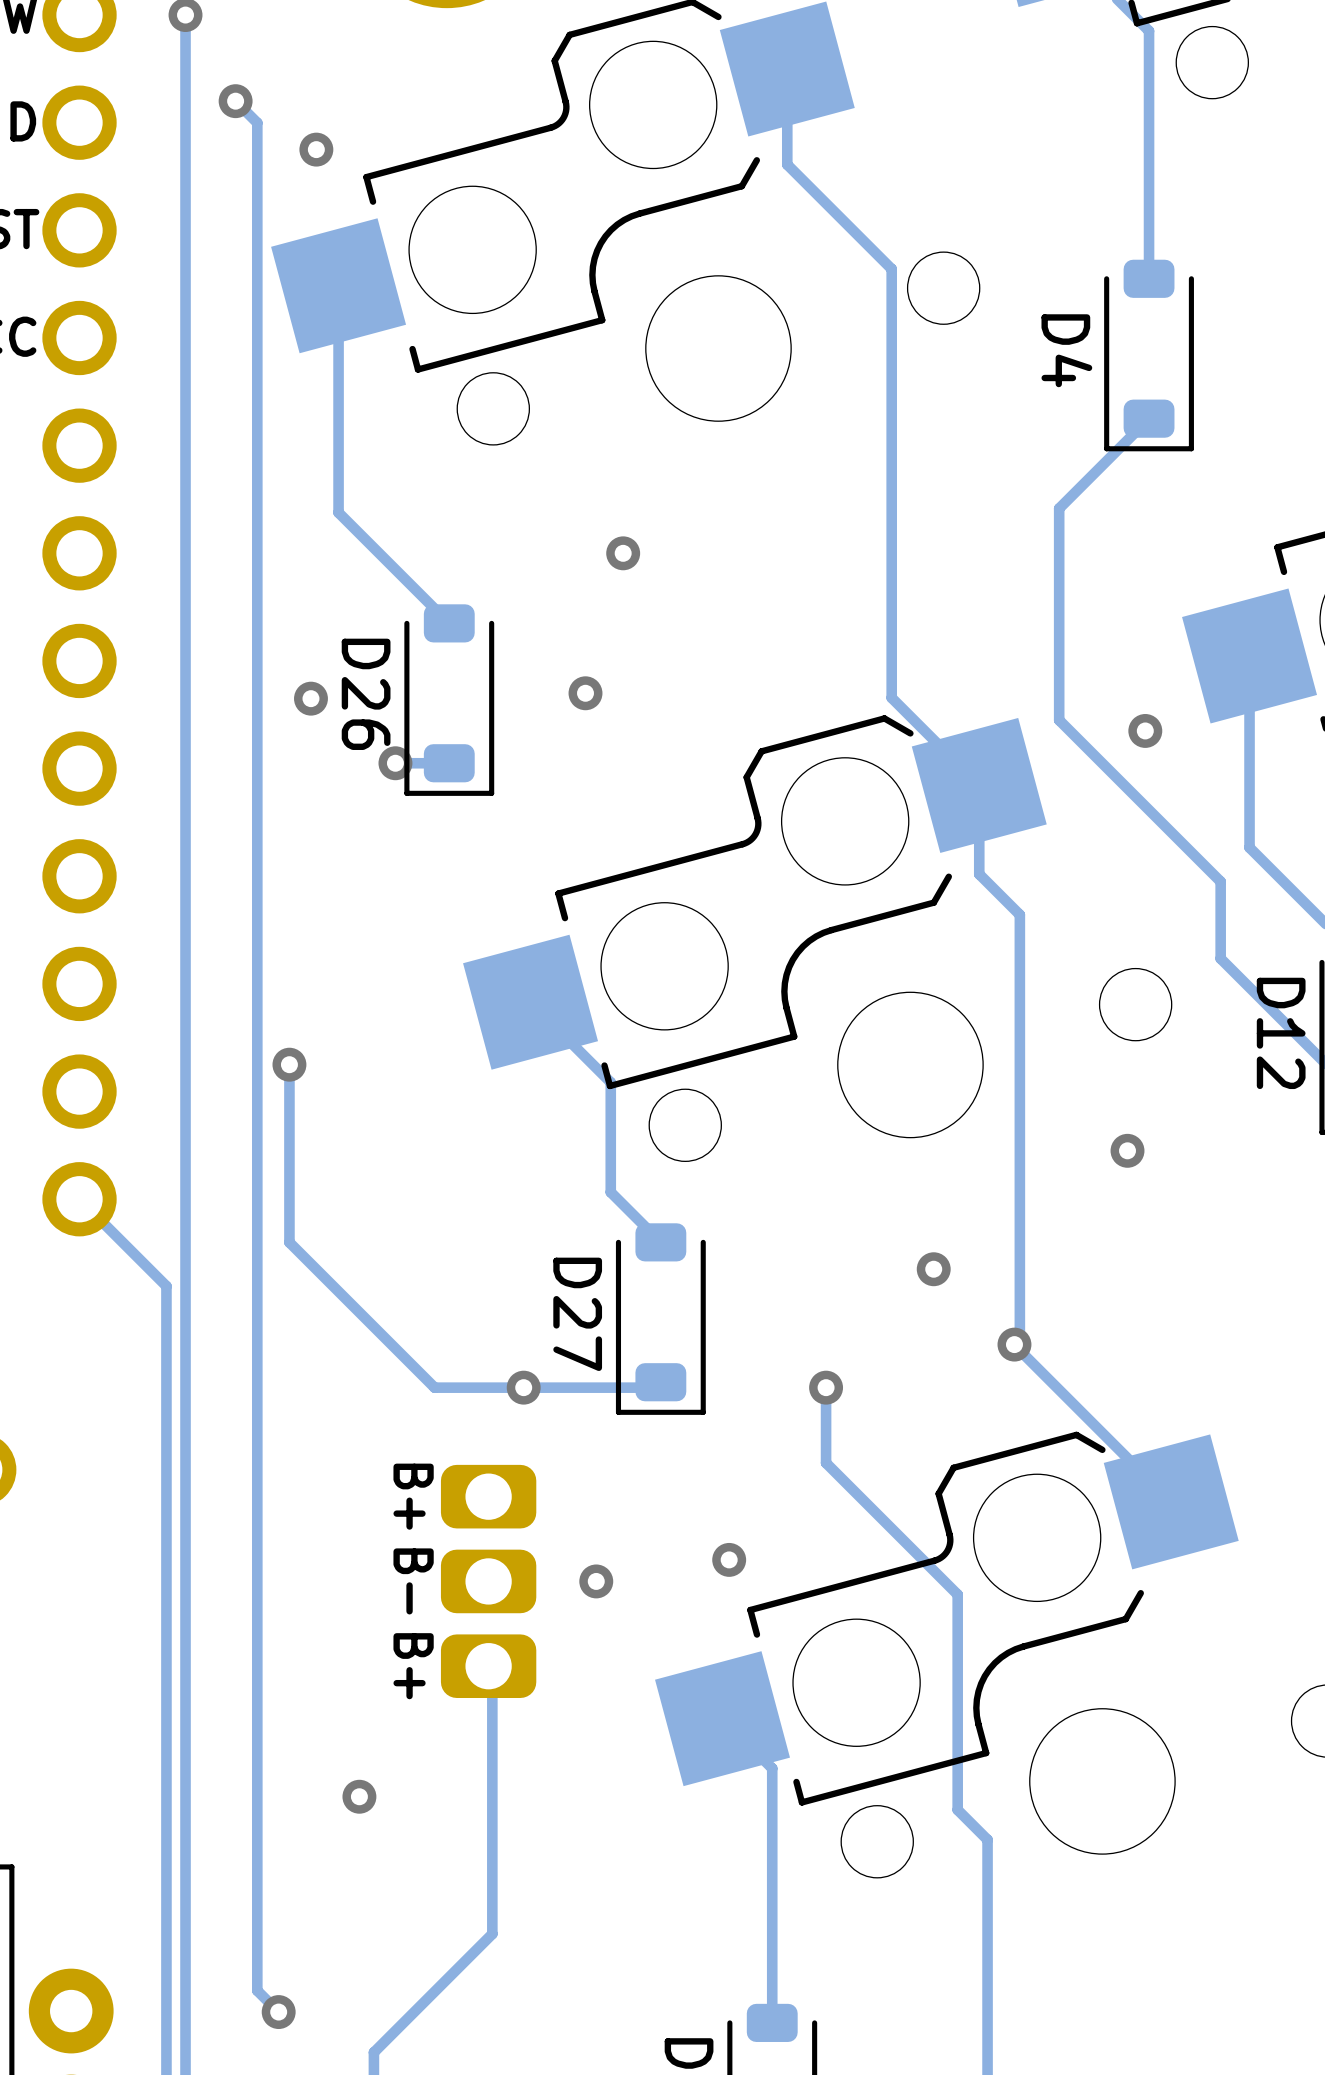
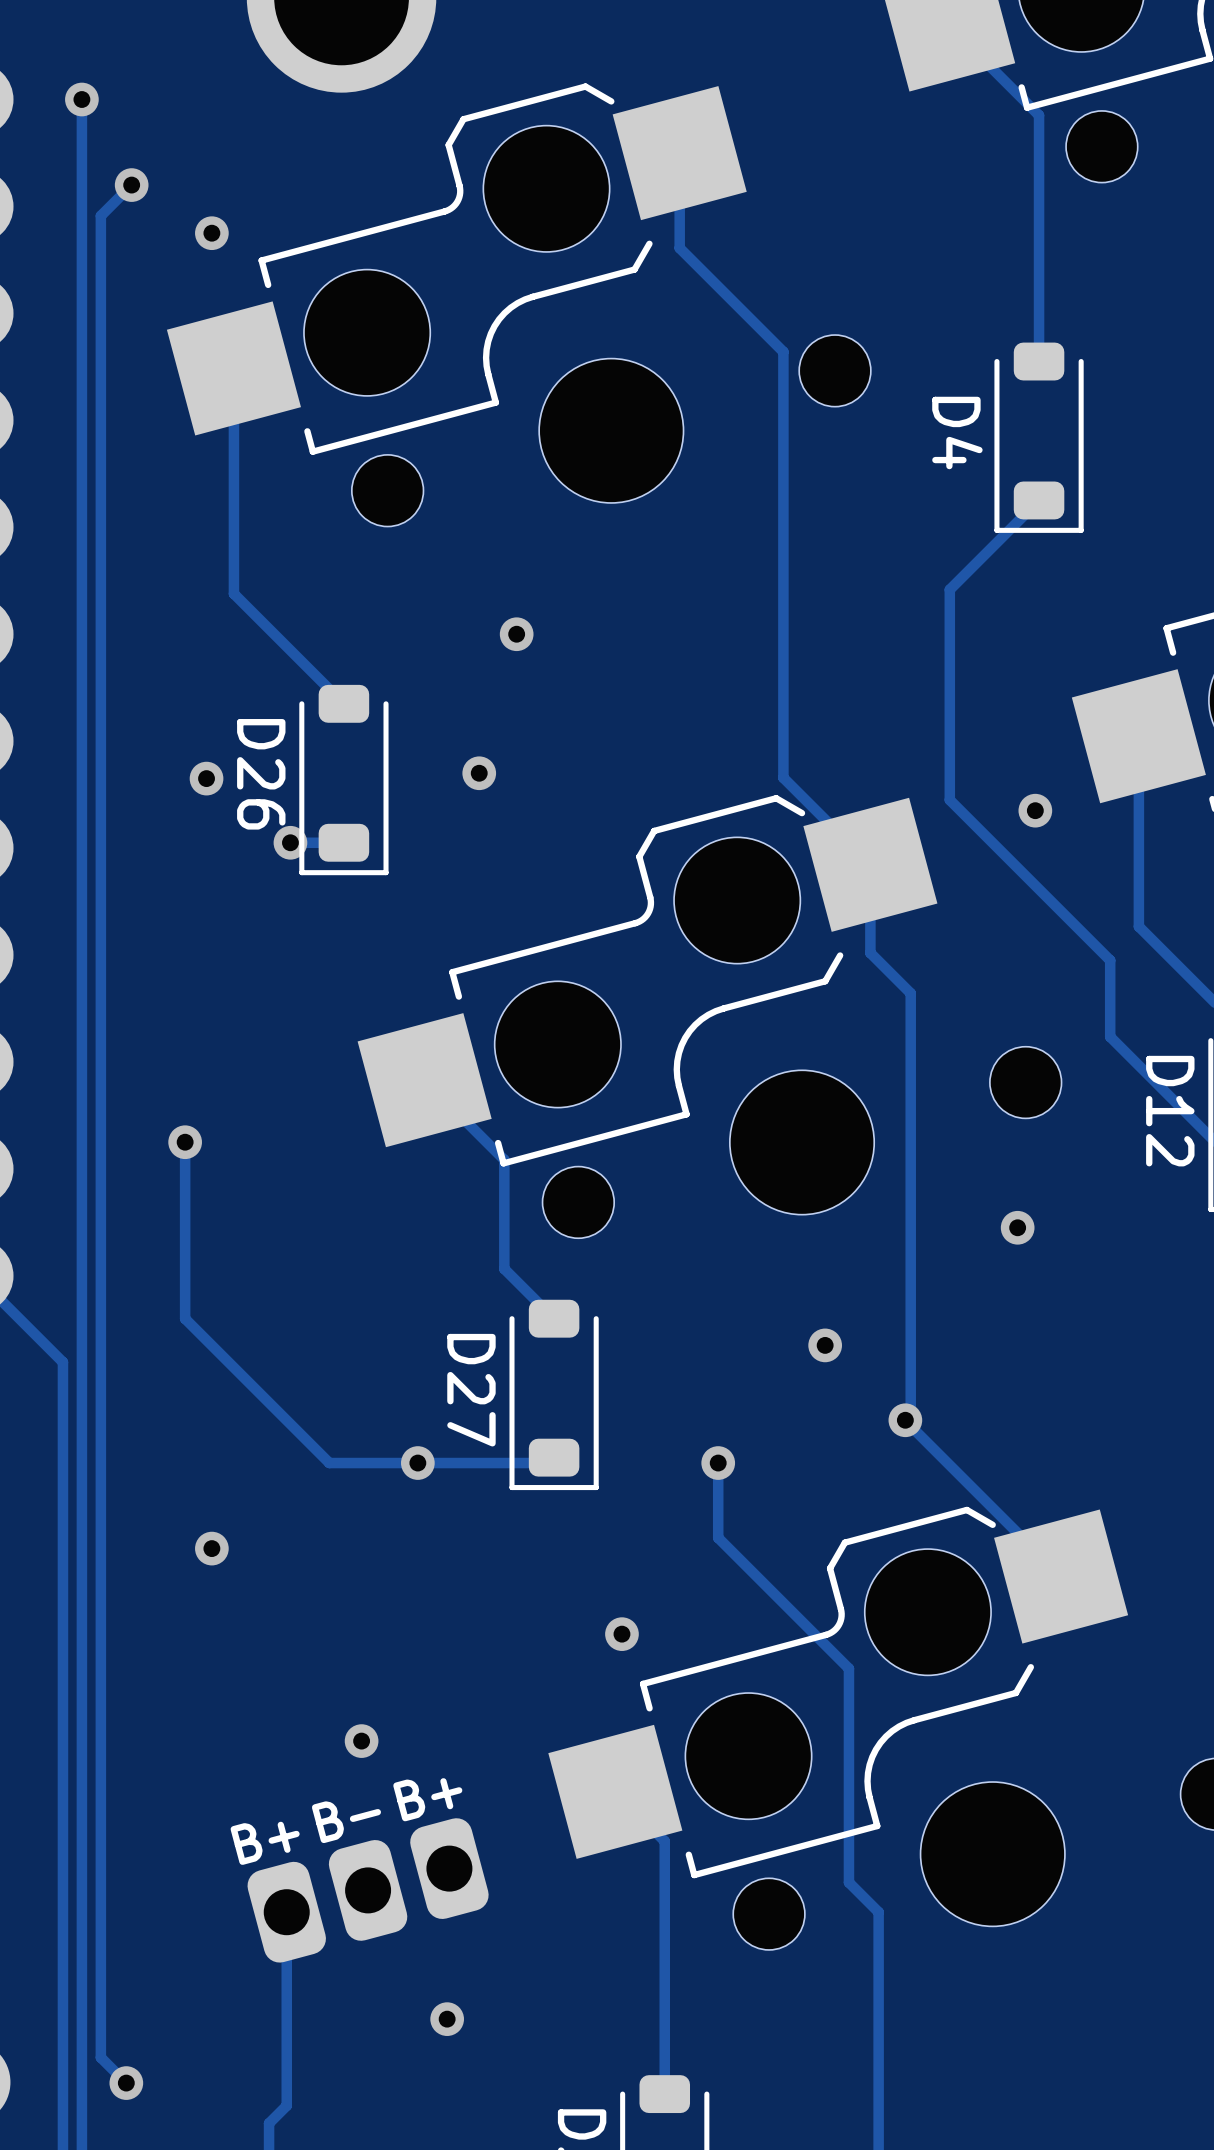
track: (235, 101) (257, 122) (257, 1990) (278, 2012) -> (131, 185) (100, 215) (100, 2057) (126, 2083)
via: none -> (211, 1548)
part: (488, 1581) -> none
via: (596, 1581) -> none
track: (488, 1666) (492, 1669) (492, 1933) (391, 2034) -> (286, 1912) (286, 2105)
via: none -> (361, 1741)
via: (359, 1796) -> none
part: none -> (368, 1890)
via: none -> (447, 2019)
via position: (278, 2012) -> (126, 2083)

